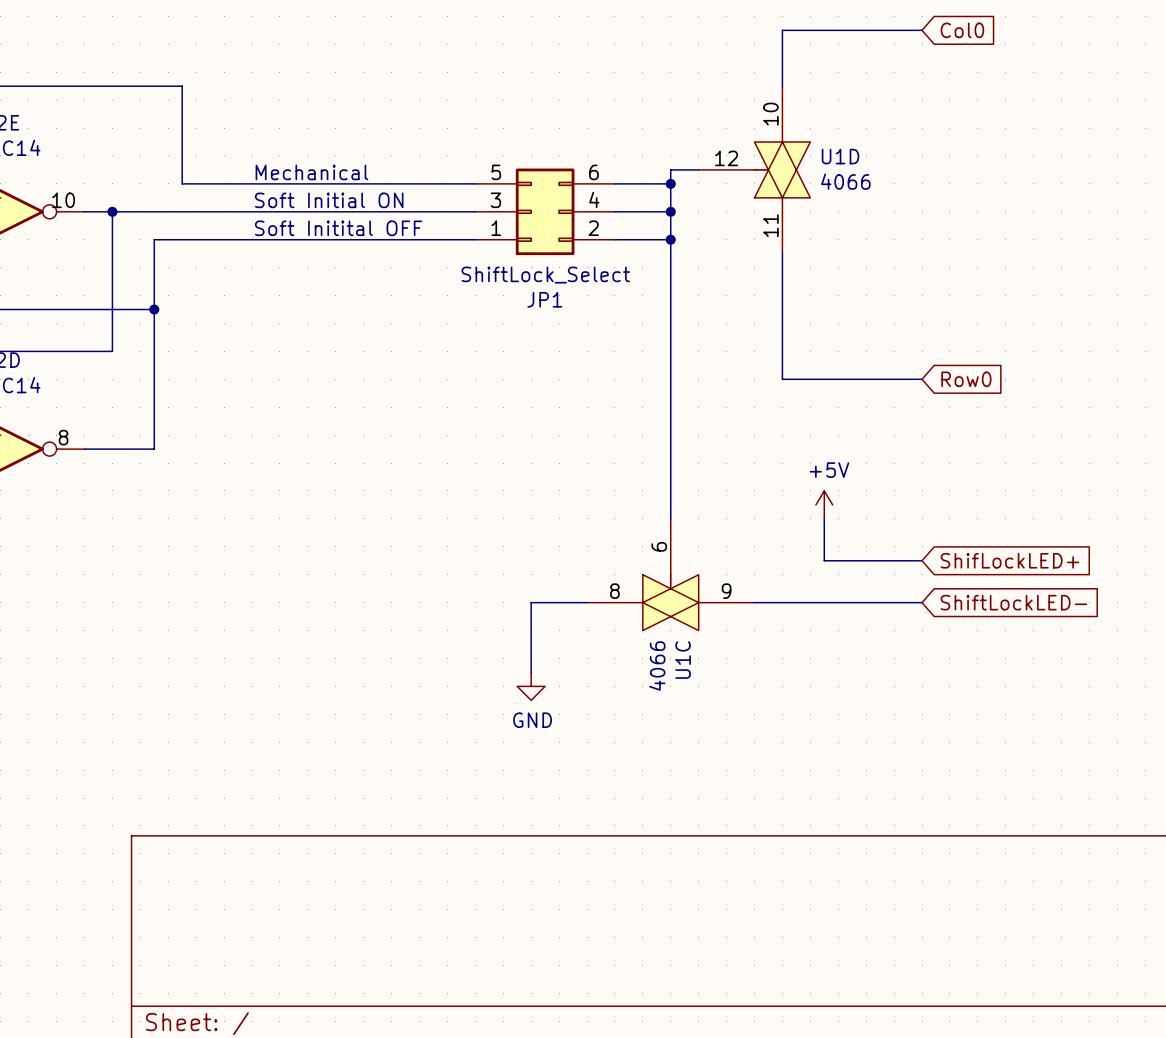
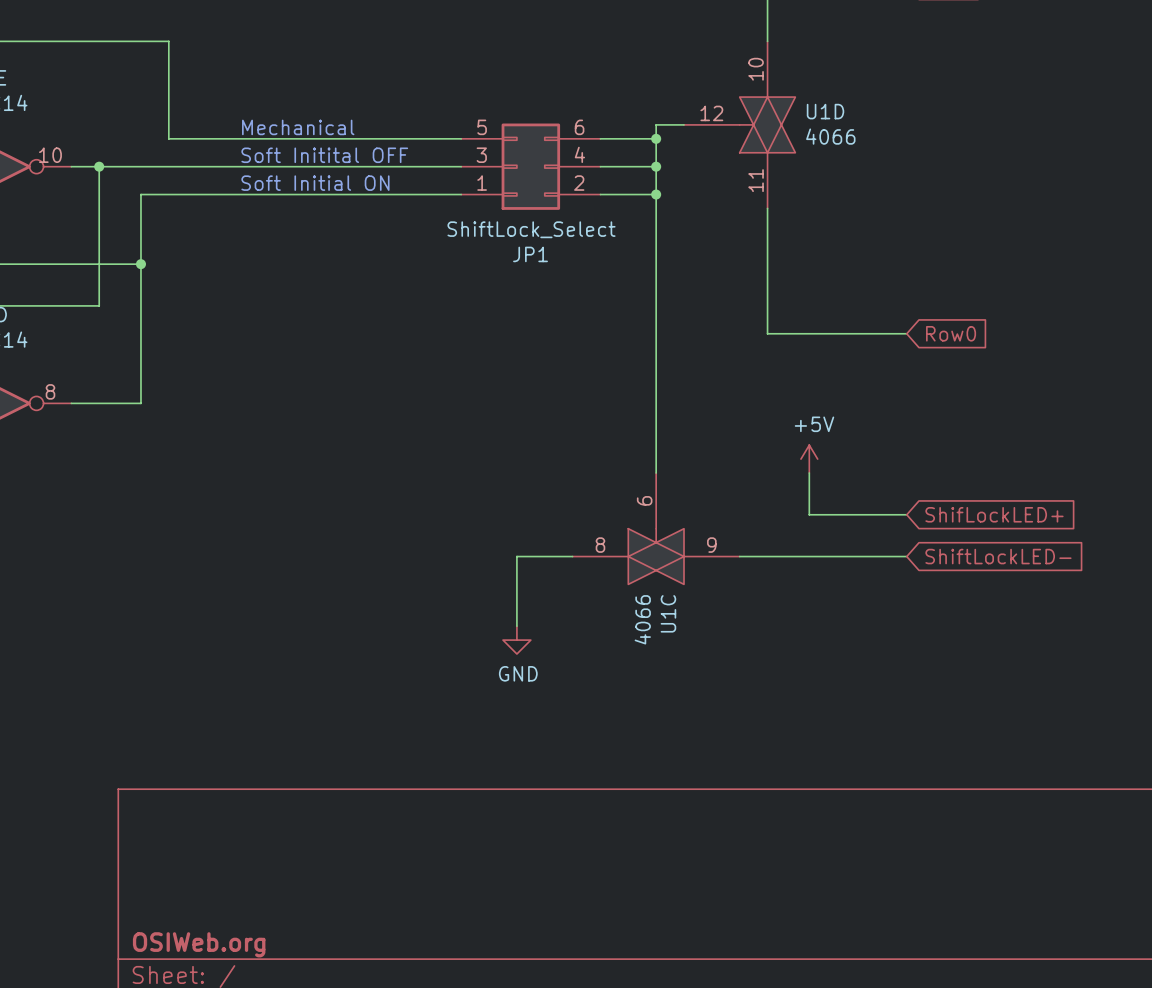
text: Soft Initial ON (329, 200) -> Soft Initital OFF (324, 155)
text: Soft Initital OFF (338, 228) -> Soft Initial ON (315, 183)
title block: none -> OSIWeb.org (199, 944)

